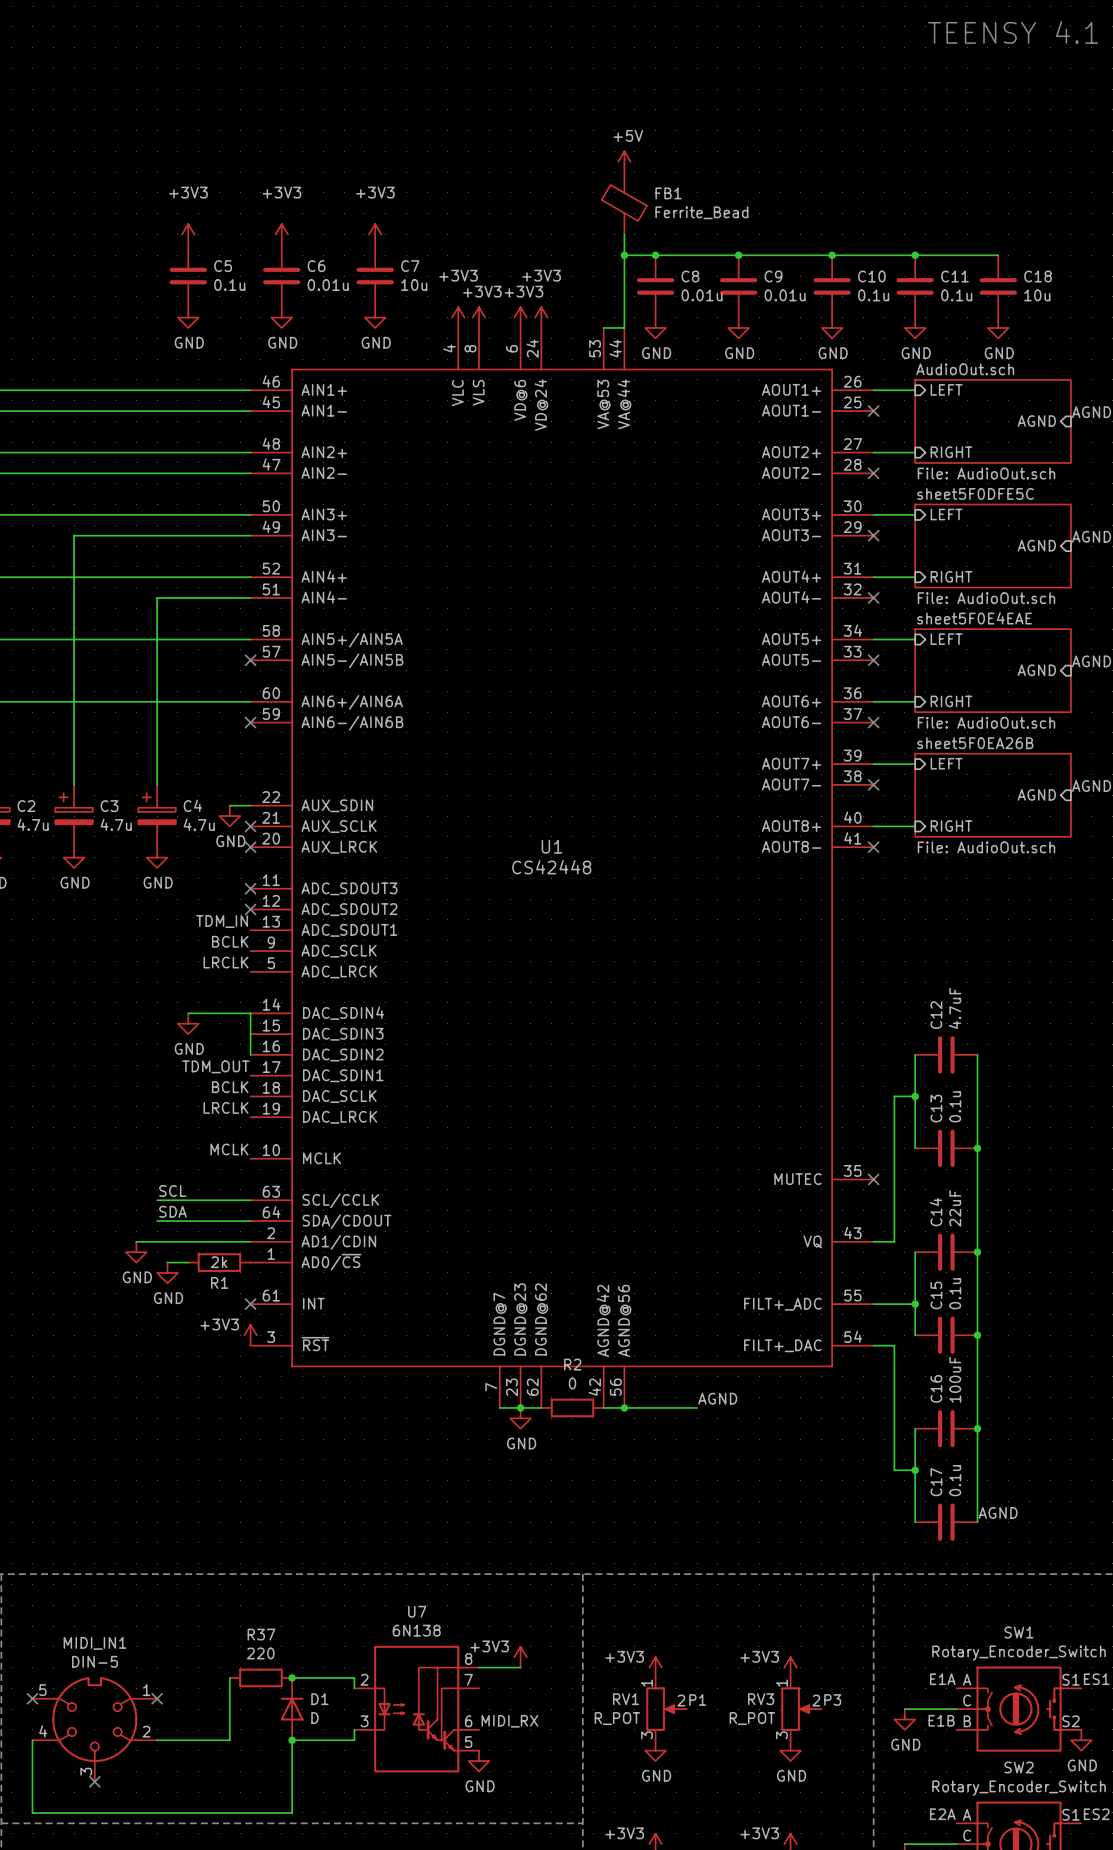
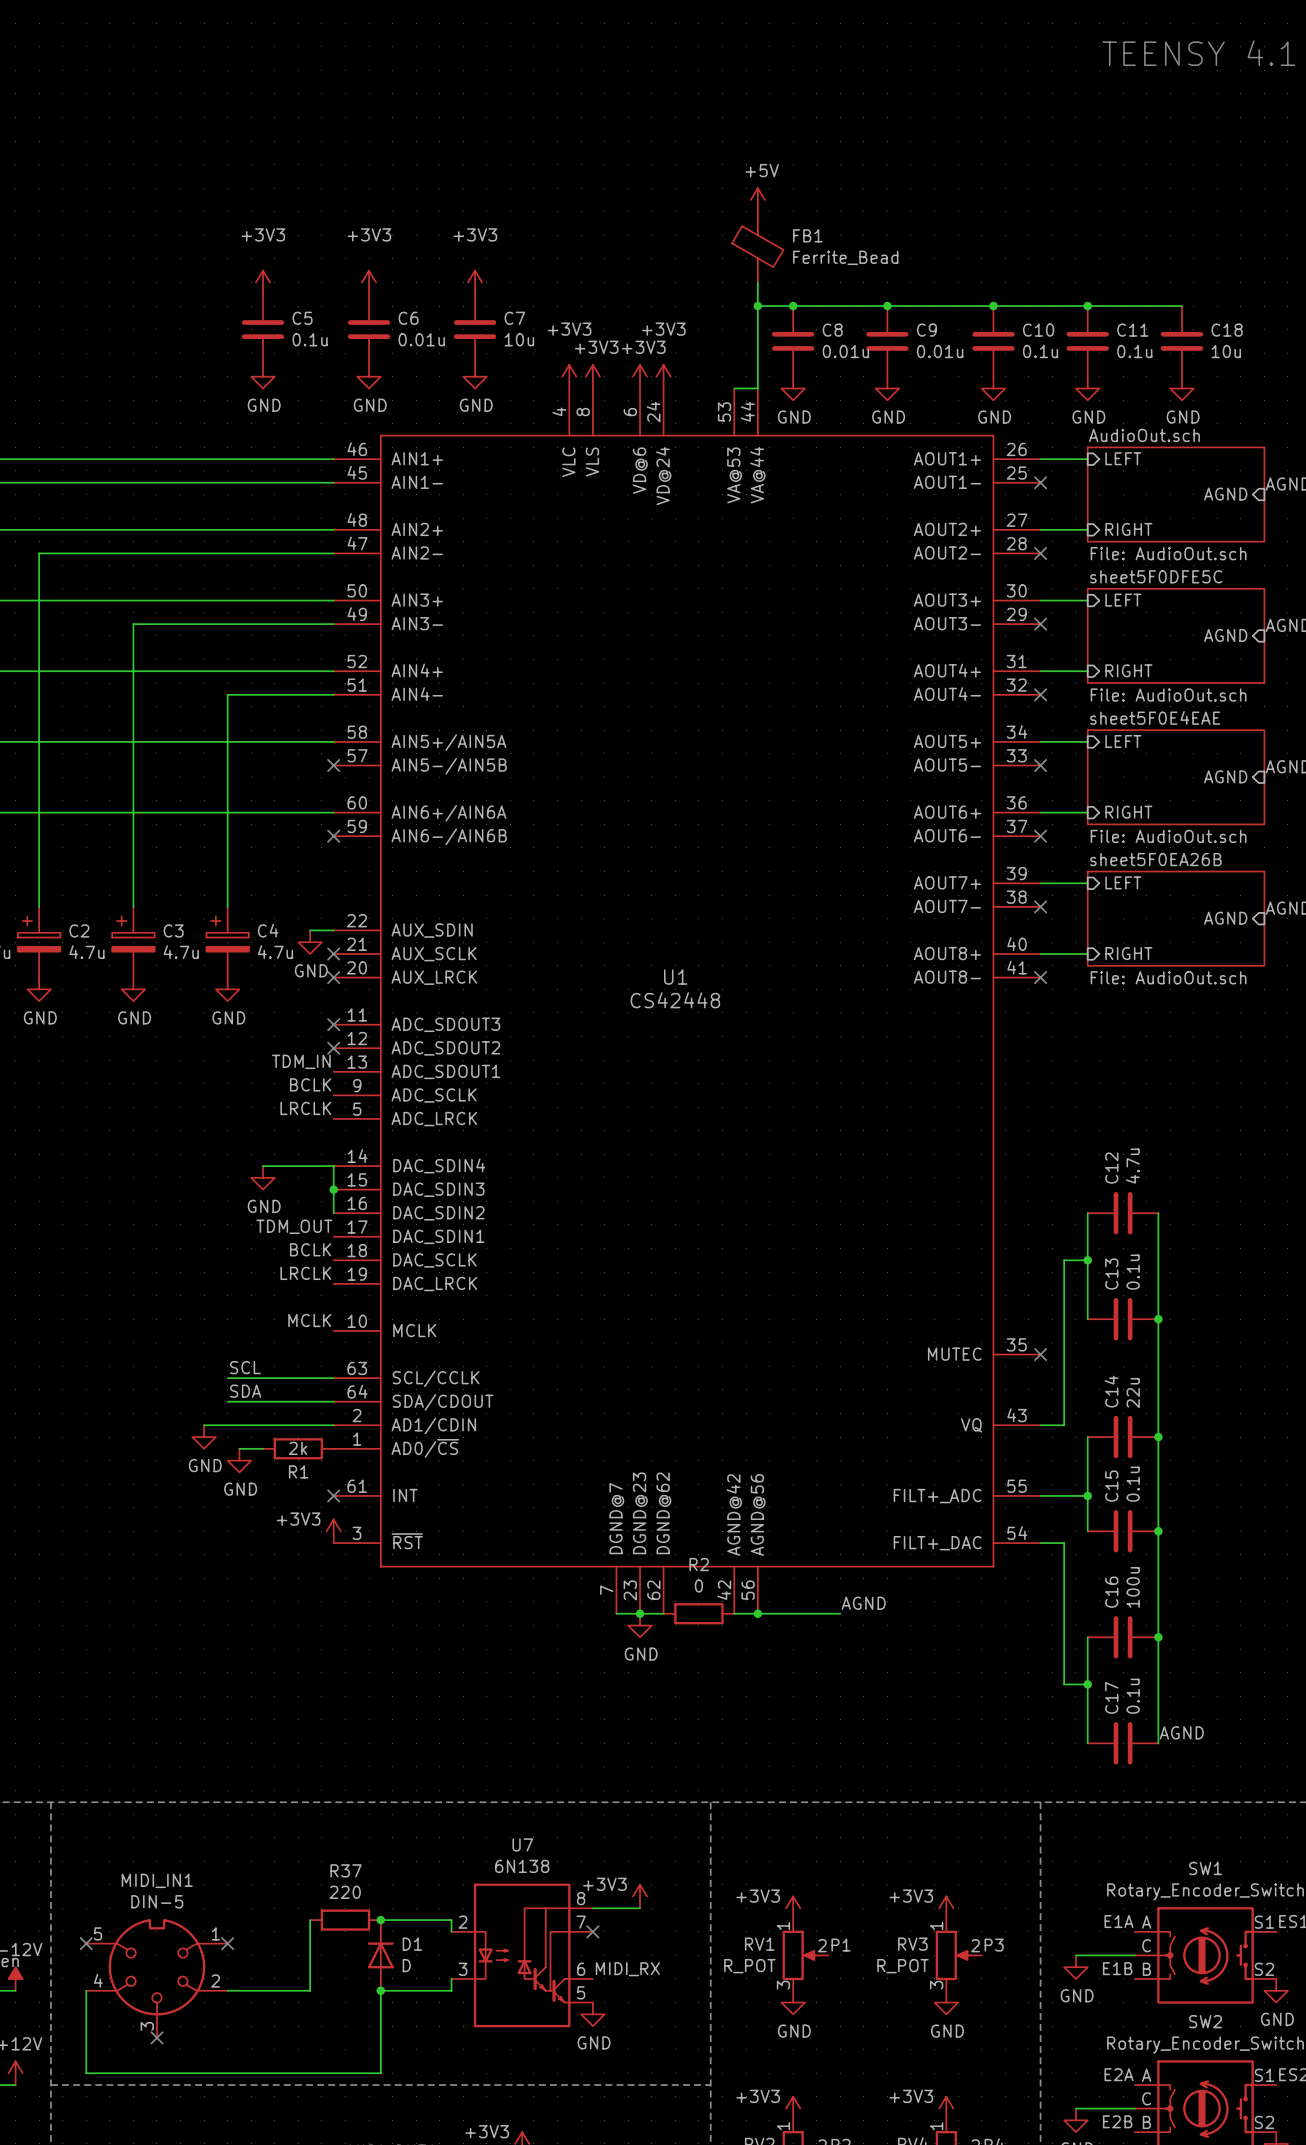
C12 value: 4.7uF (955, 1008) -> 4.7u (1132, 1166)
junction: none -> (333, 1189)
C14 value: 22uF (955, 1208) -> 22u (1133, 1393)
C16 value: 100uF (955, 1379) -> 100u (1133, 1587)
no-connect mark: none -> (592, 1931)

